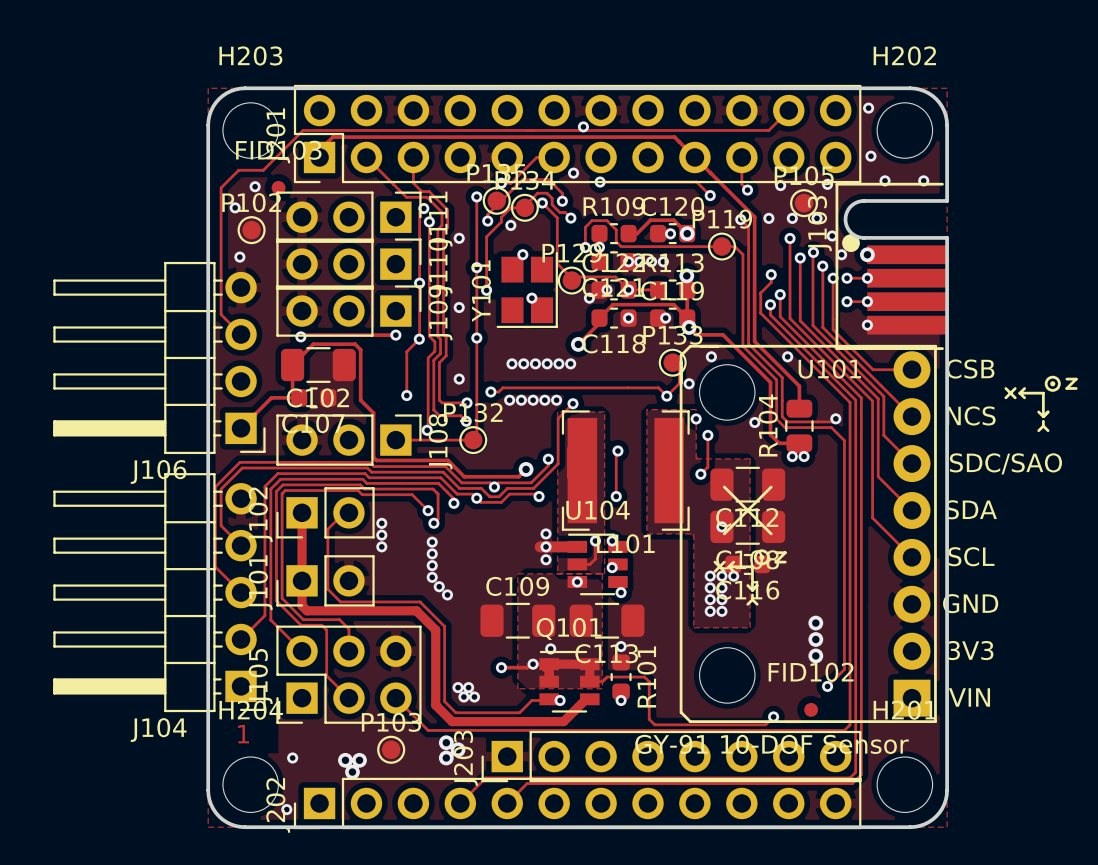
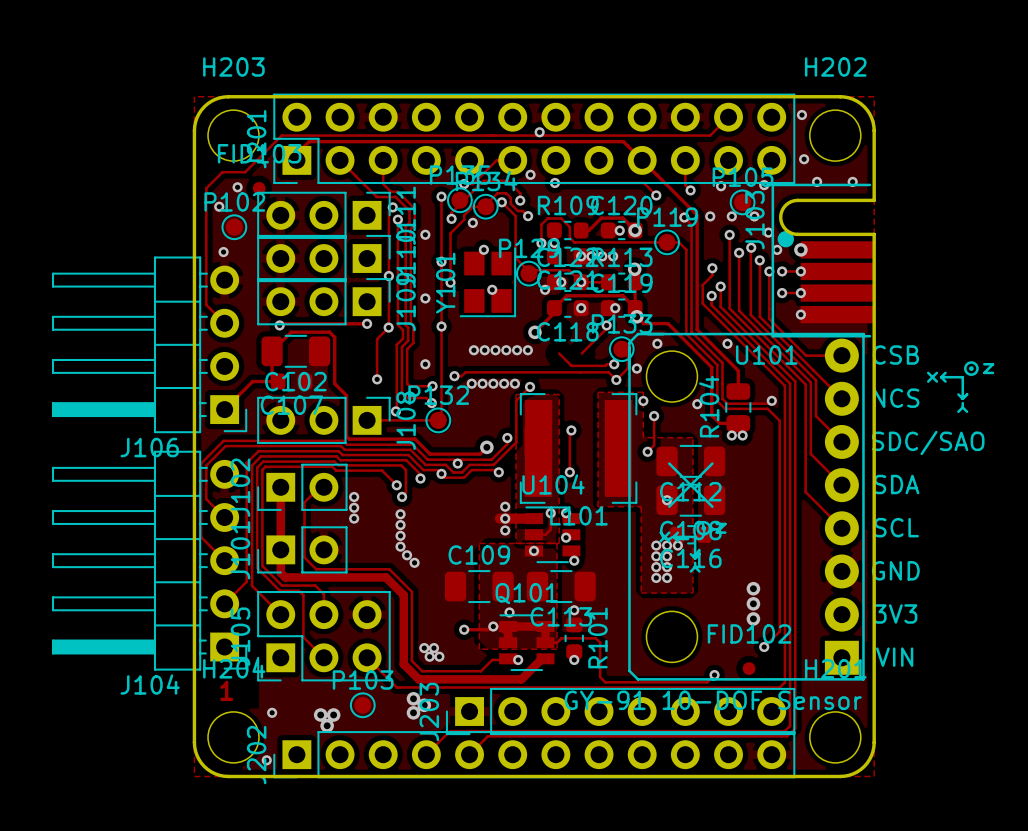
track: none -> (606, 325) (606, 328) (581, 353)
via: none -> (606, 325)
track: none -> (559, 353) (571, 365) (614, 364)
via: none -> (614, 364)

